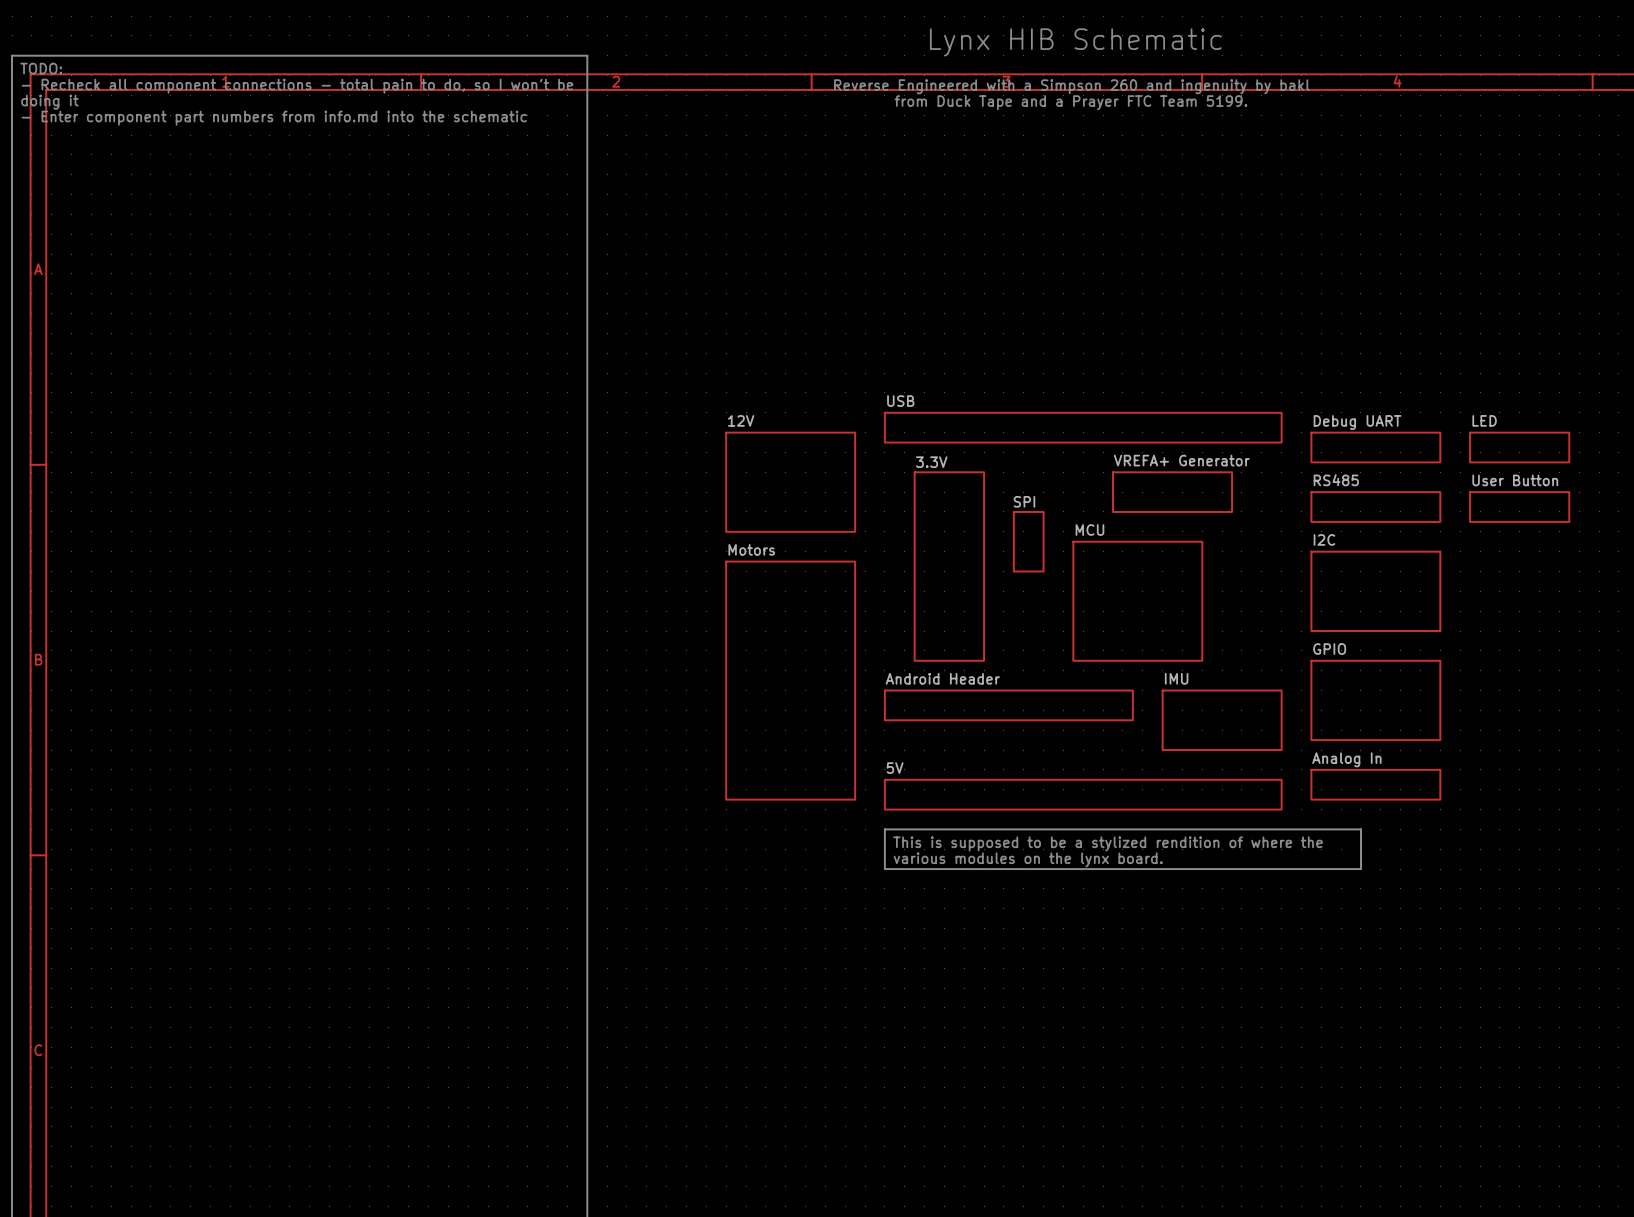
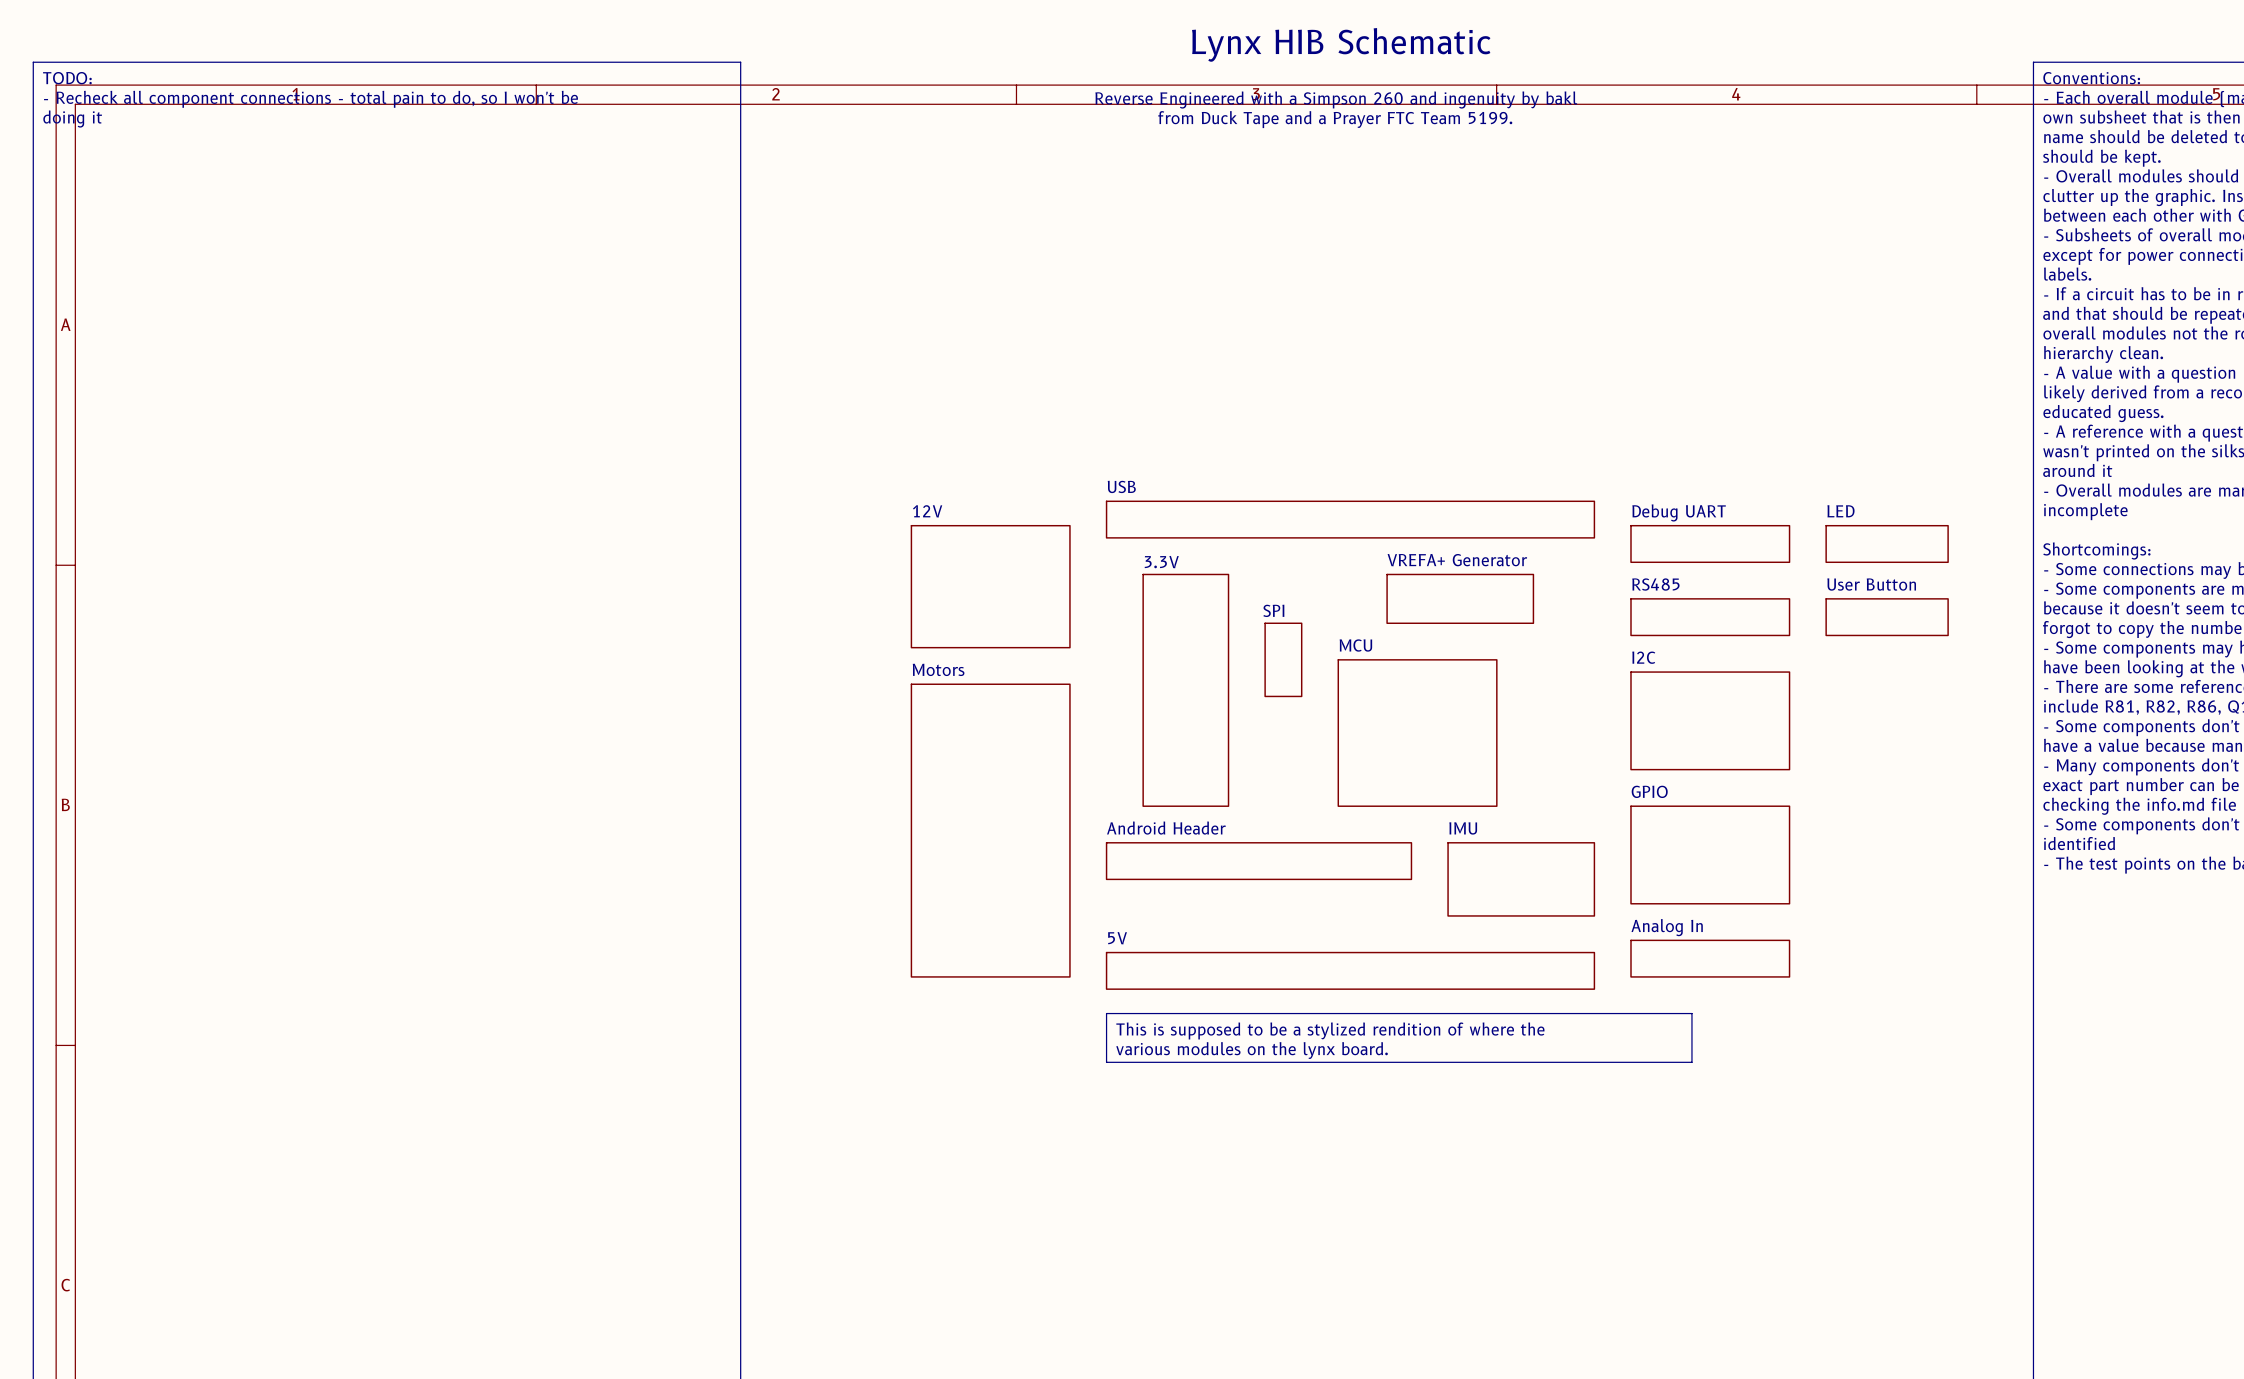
text: - Enter component part numbers from info.md into the schematic (274, 118) -> none

